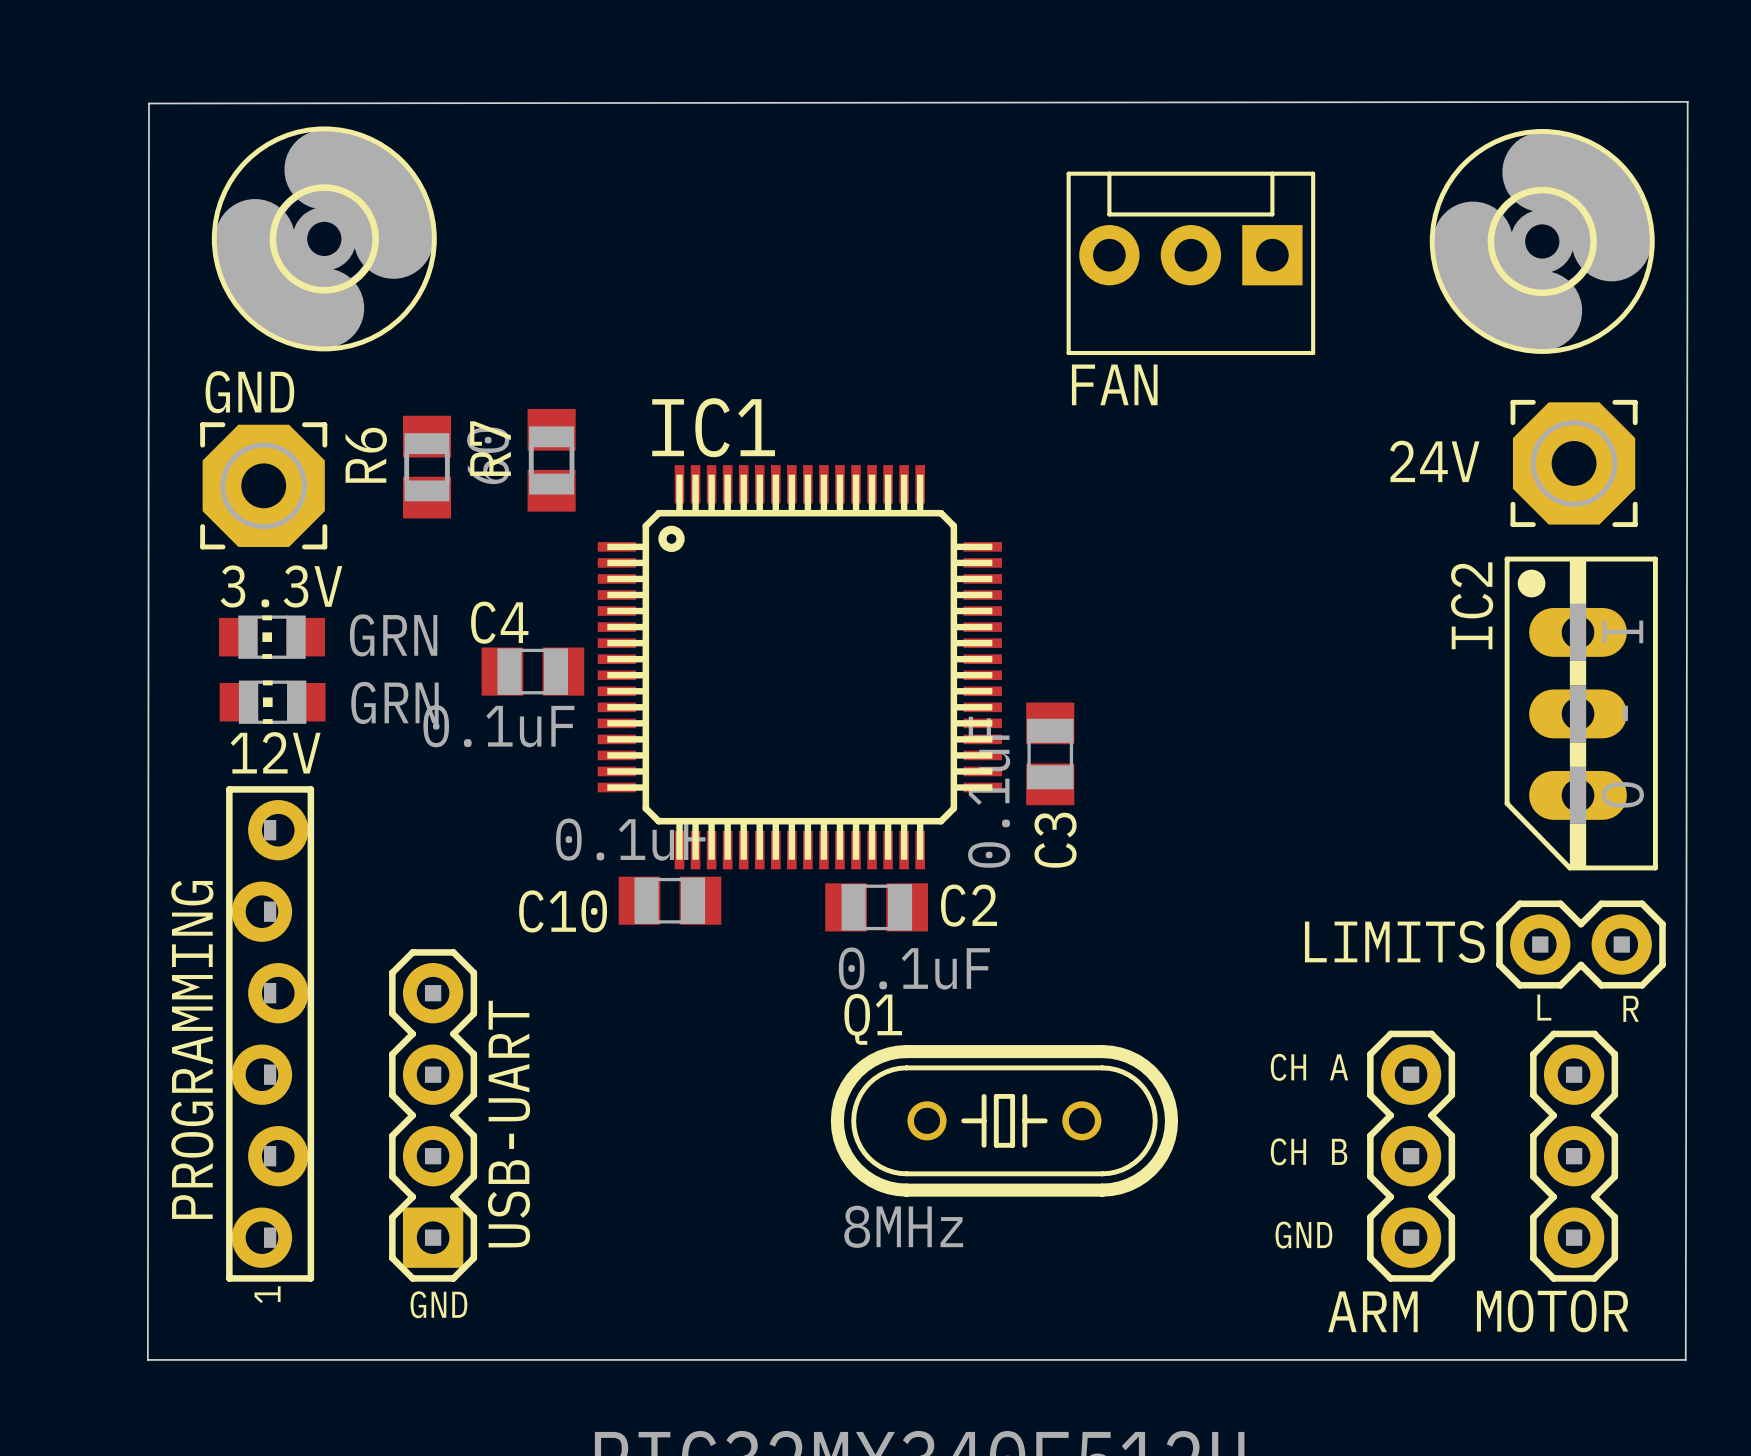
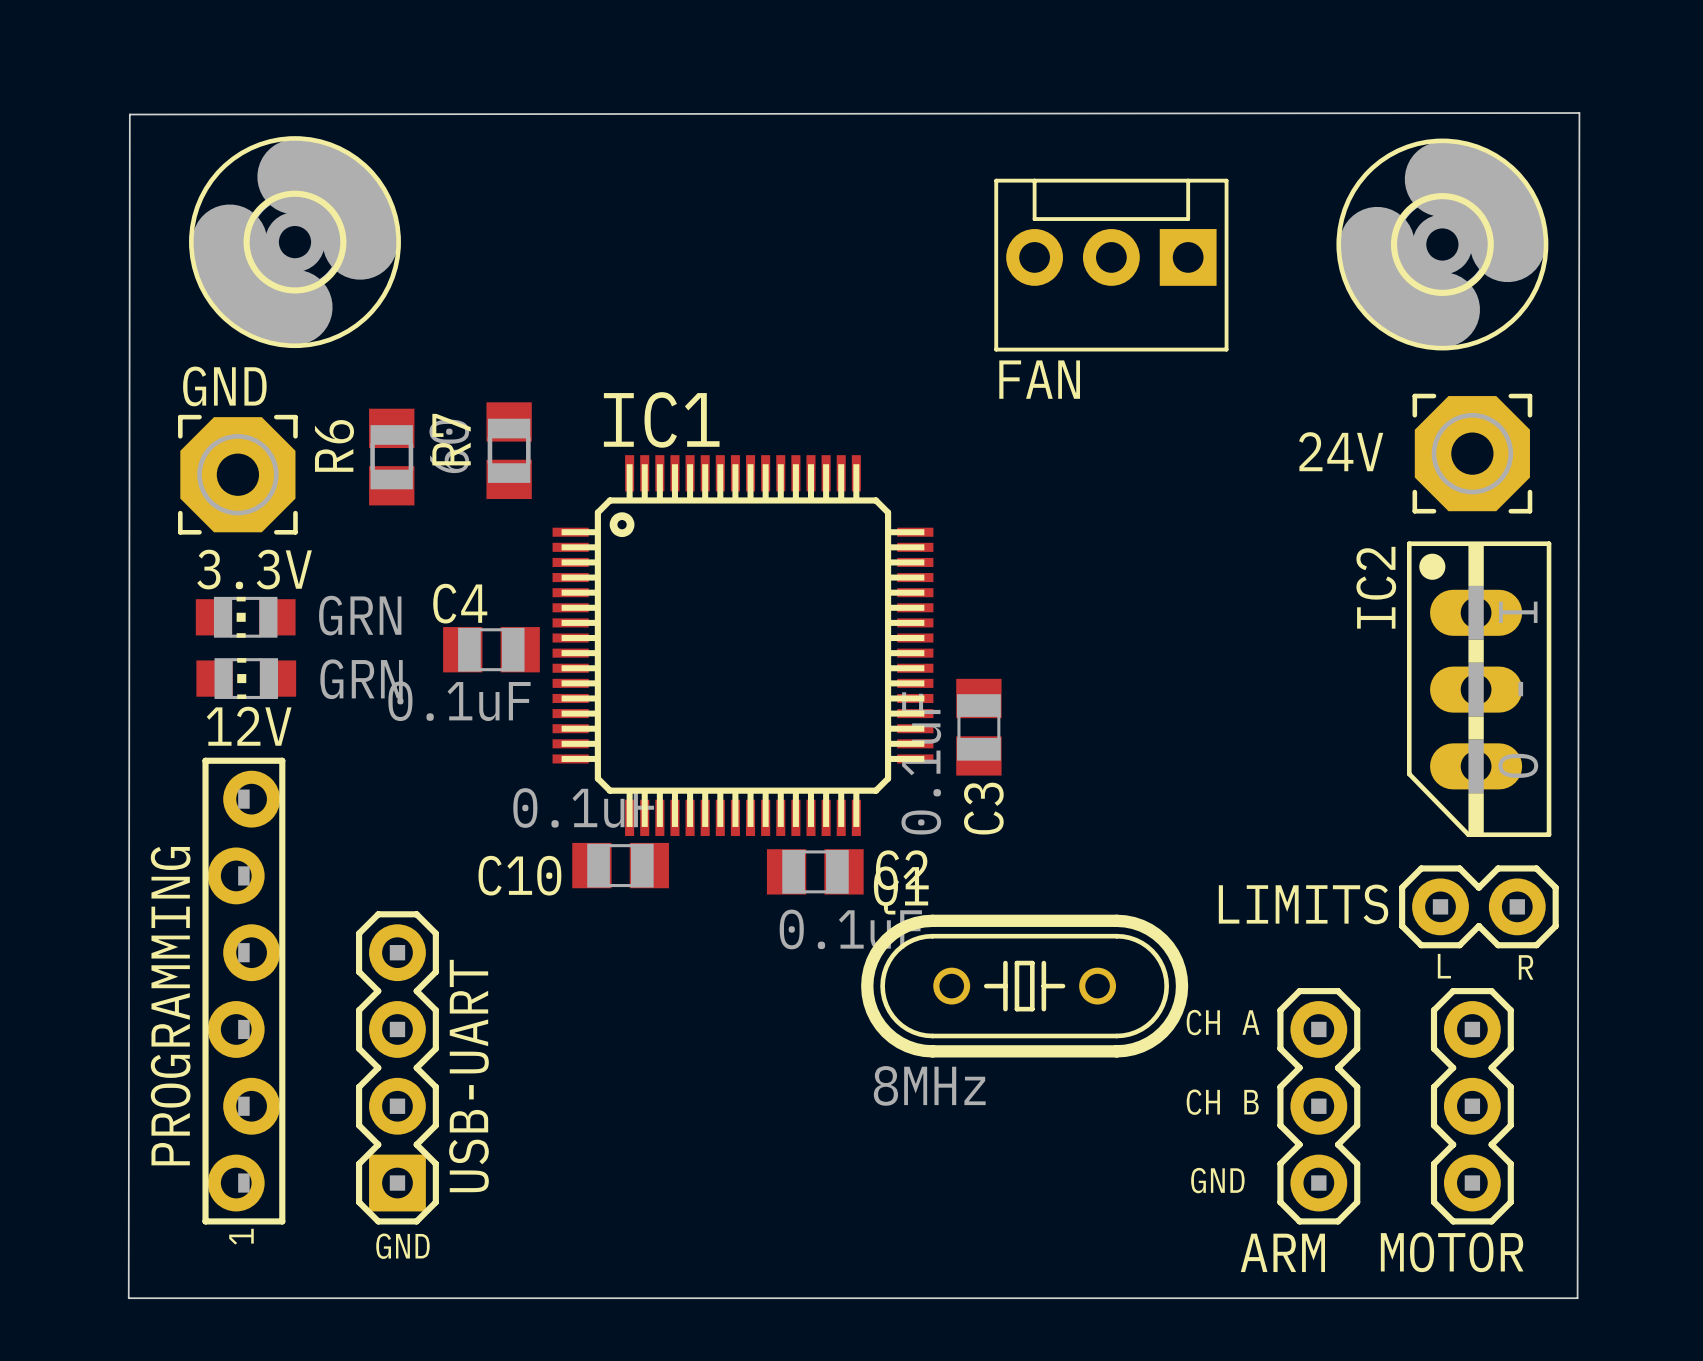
Q1 position: (1004, 1120) -> (1024, 986)

